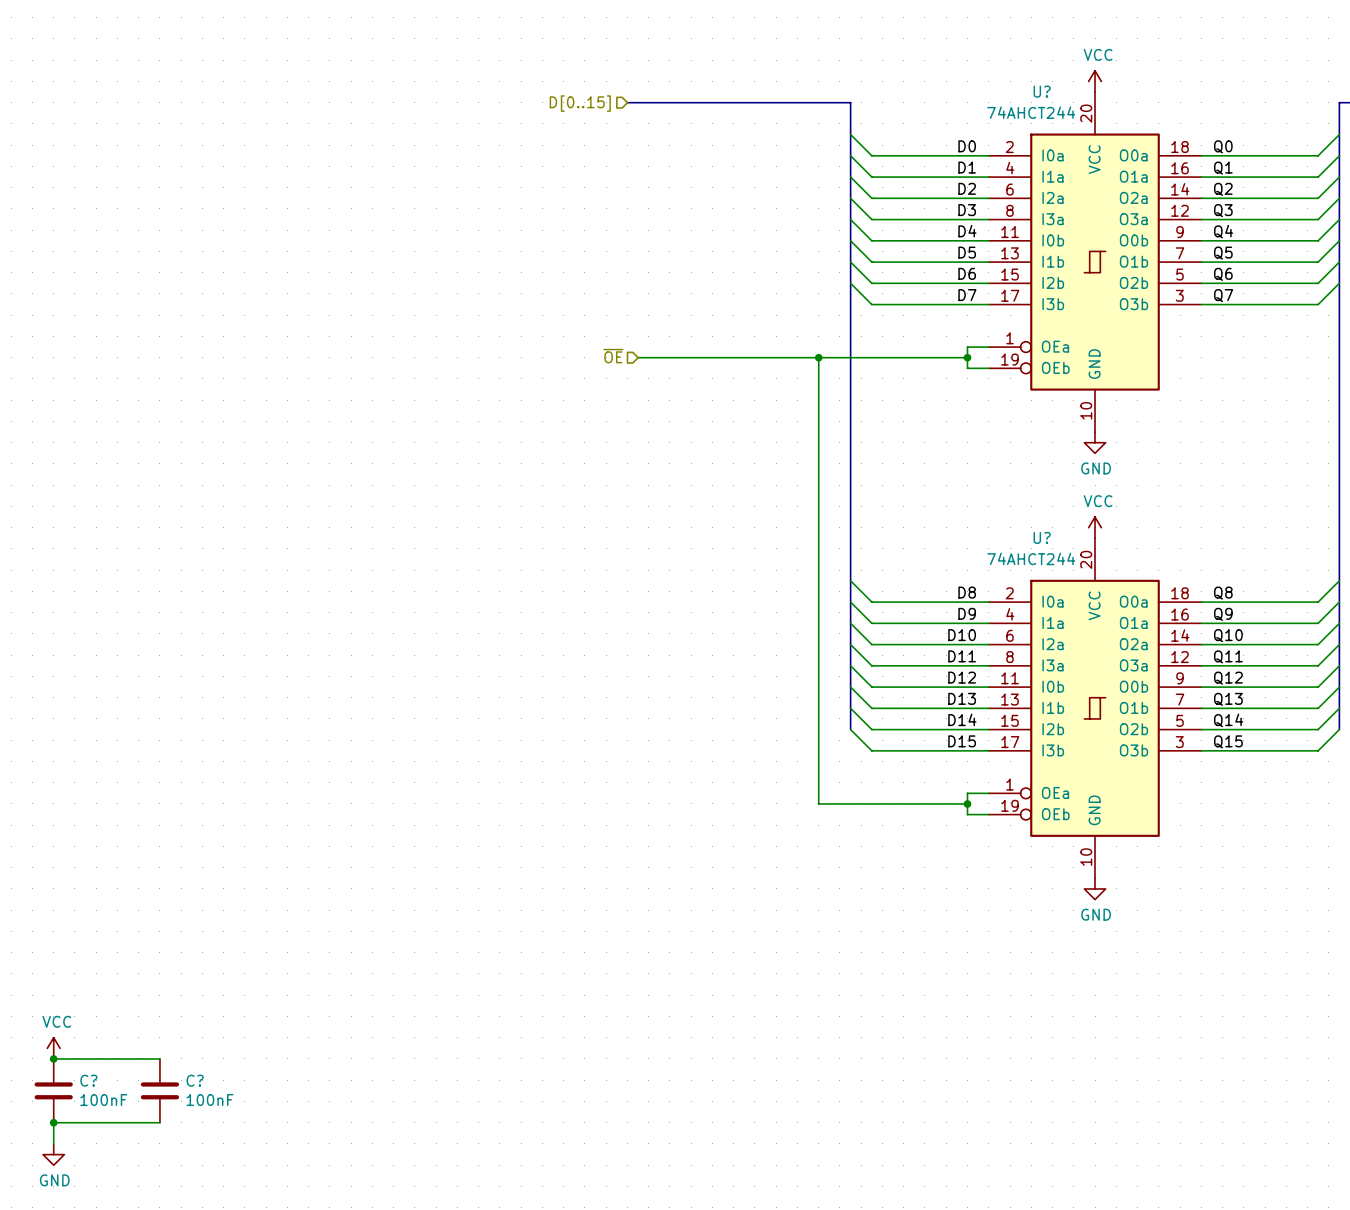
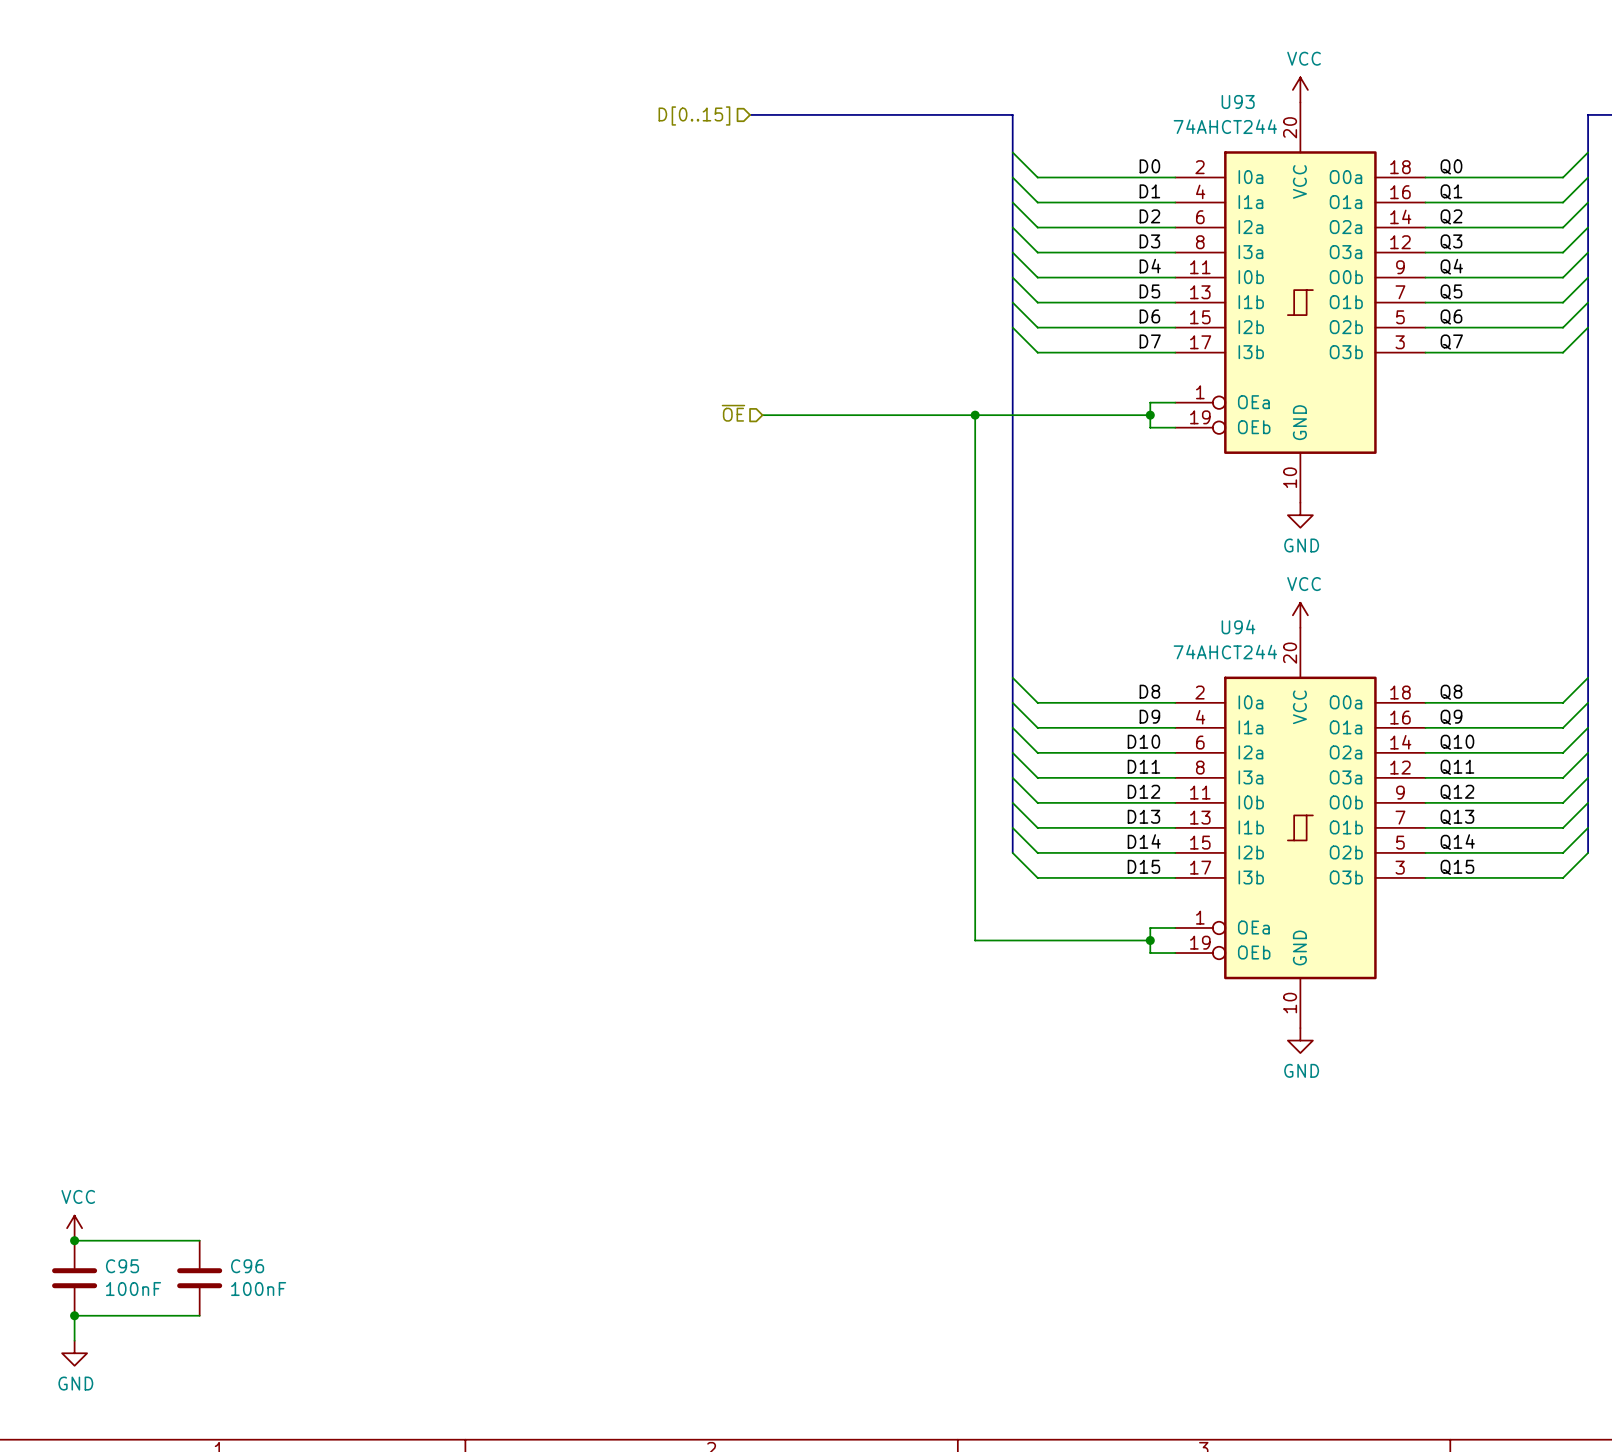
U? name: U? (1042, 91) -> U93 (1238, 101)
U? name: U? (1042, 537) -> U94 (1238, 627)
C? name: C? (88, 1080) -> C95 (122, 1266)
C? name: C? (195, 1080) -> C96 (247, 1266)

